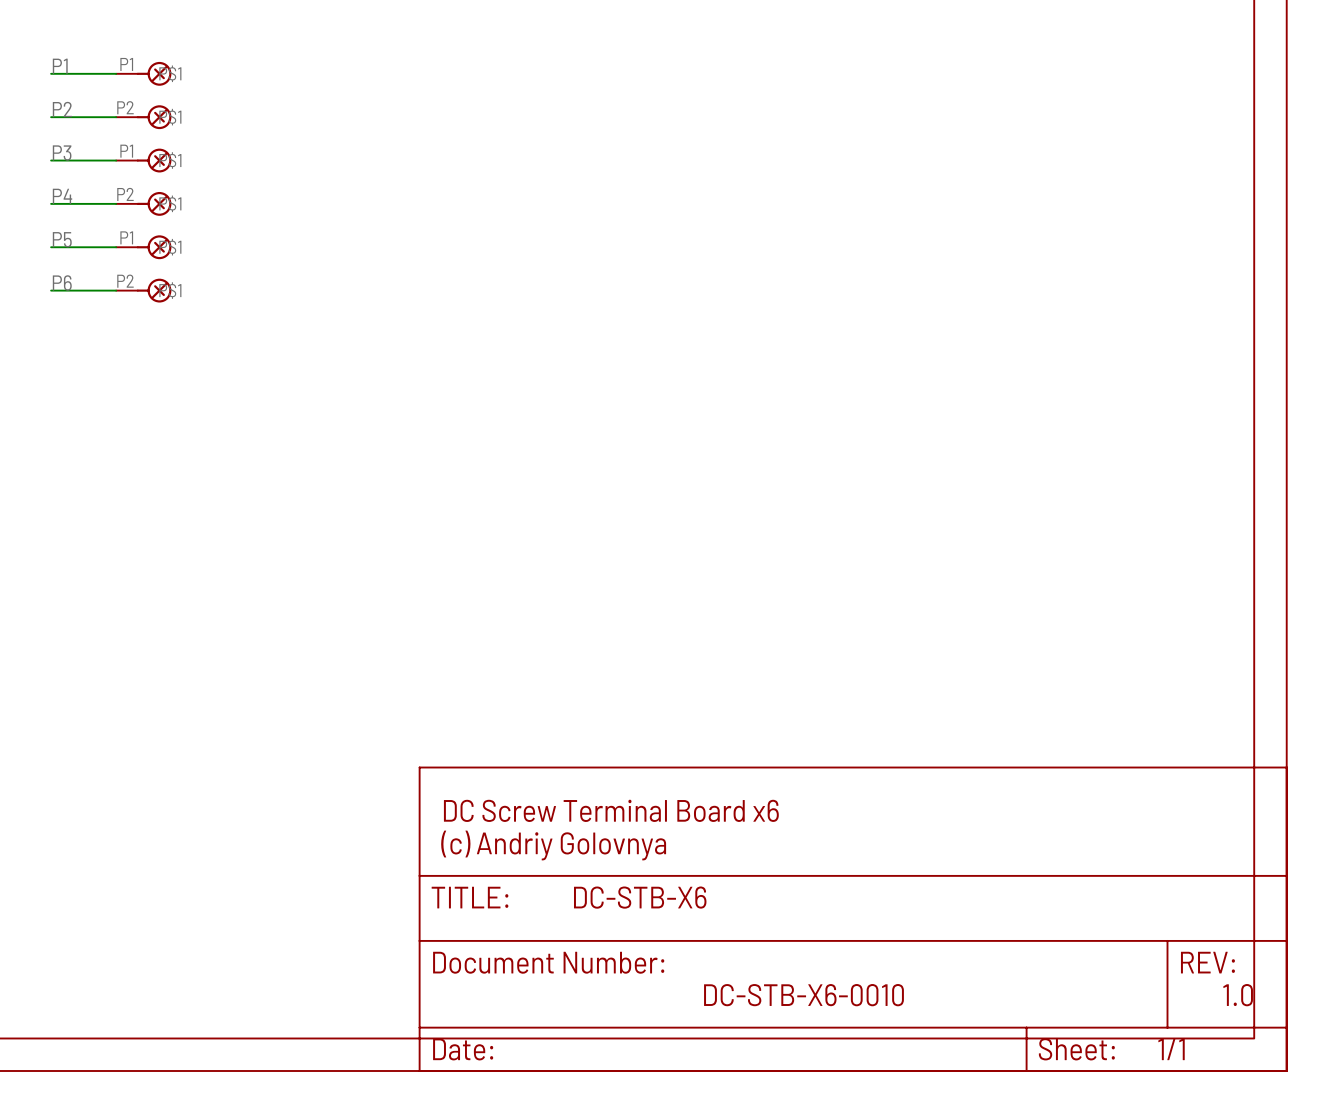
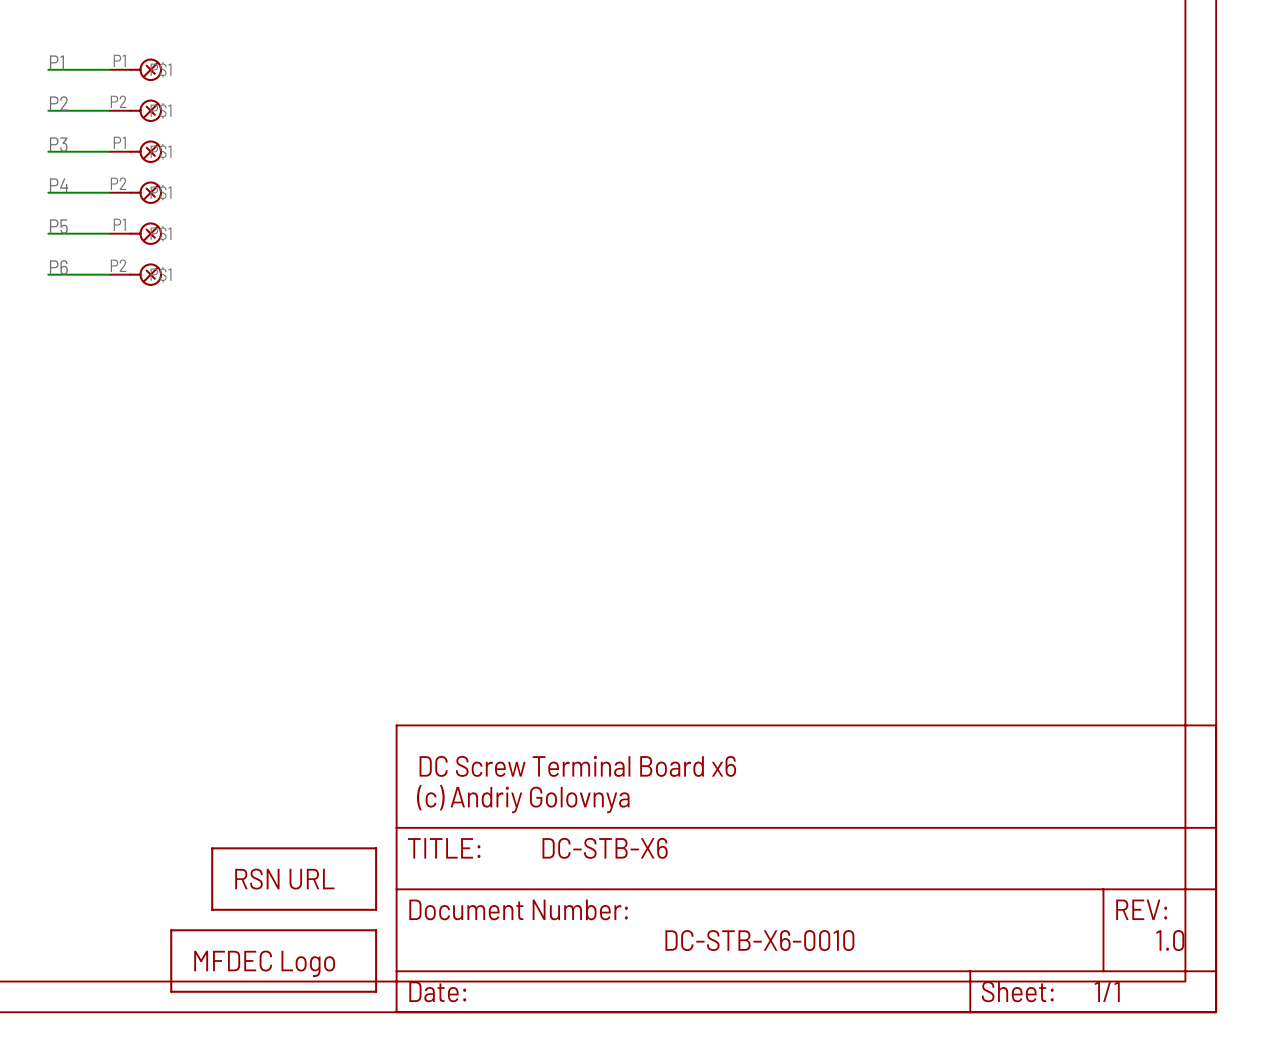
part: none -> (294, 879)
part: none -> (273, 961)

